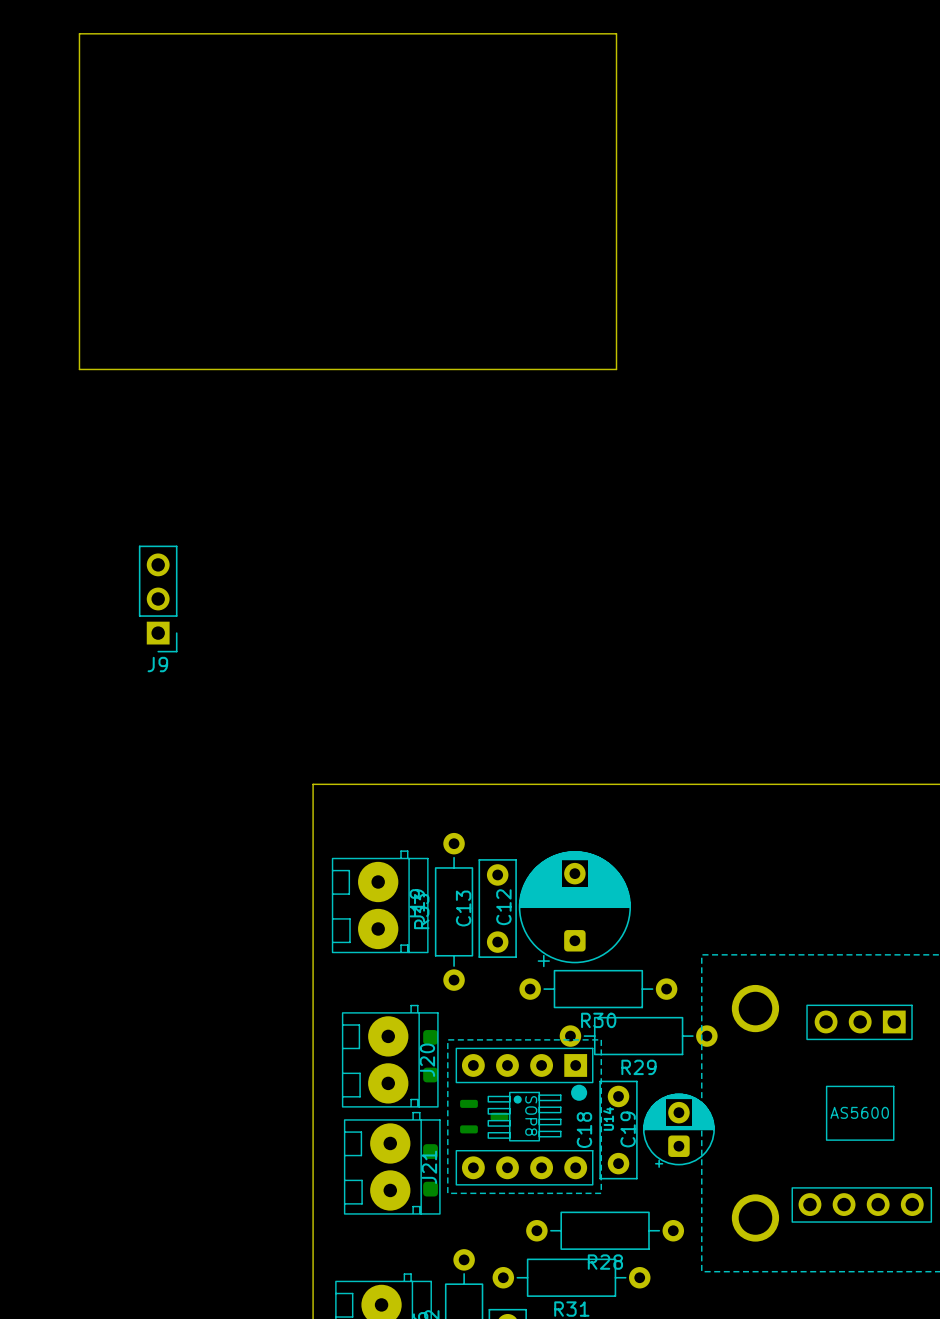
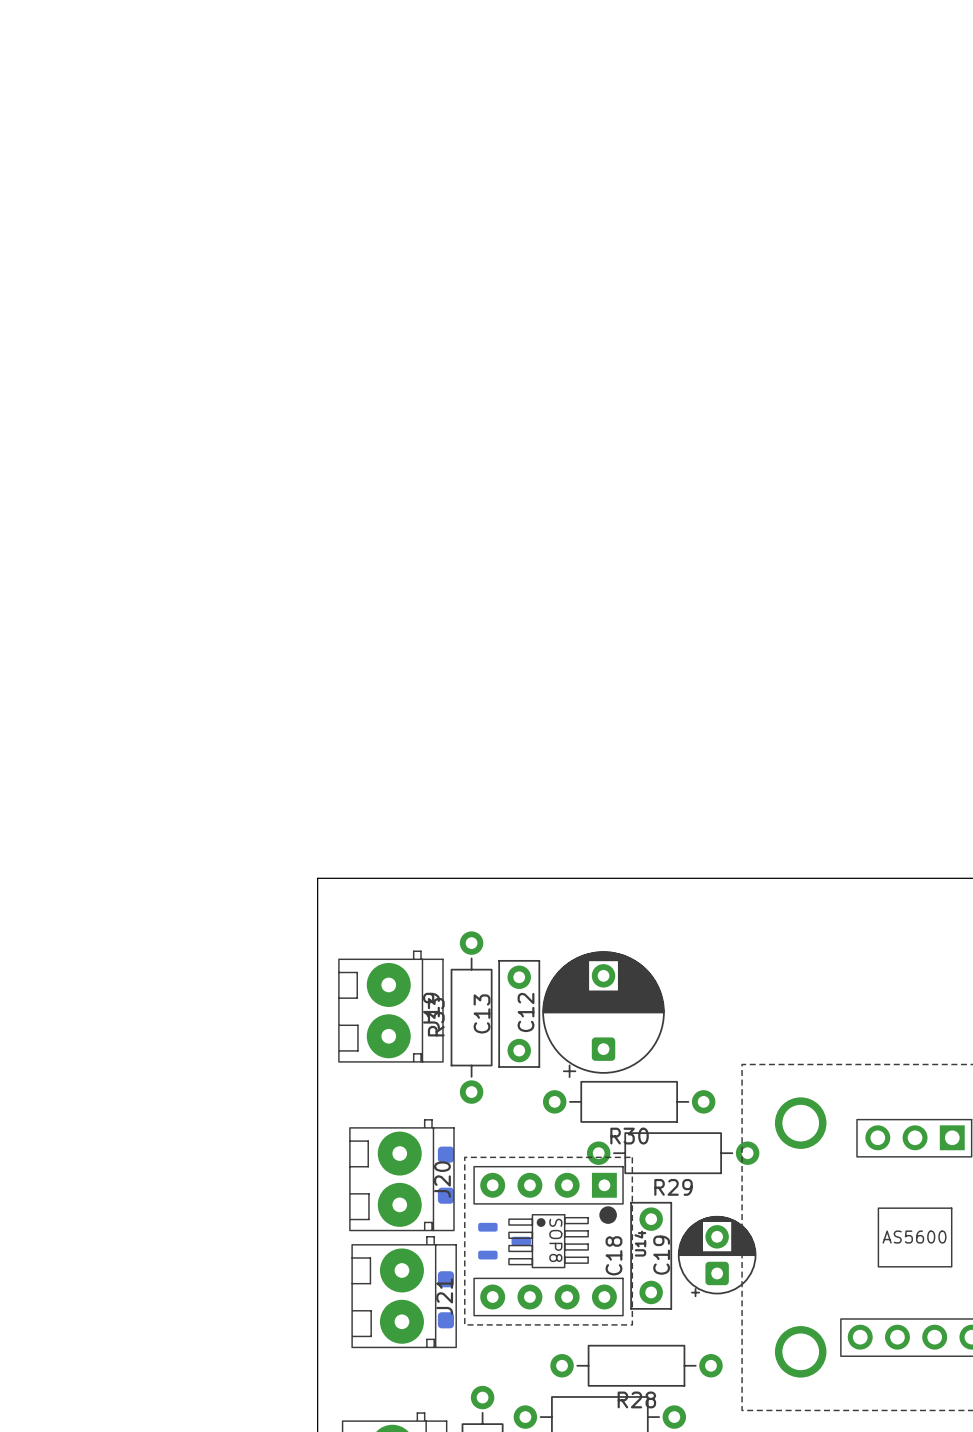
board edge: (79, 33) (616, 33) (616, 369) (79, 369) (79, 33) -> none
J9: (158, 598) -> none

